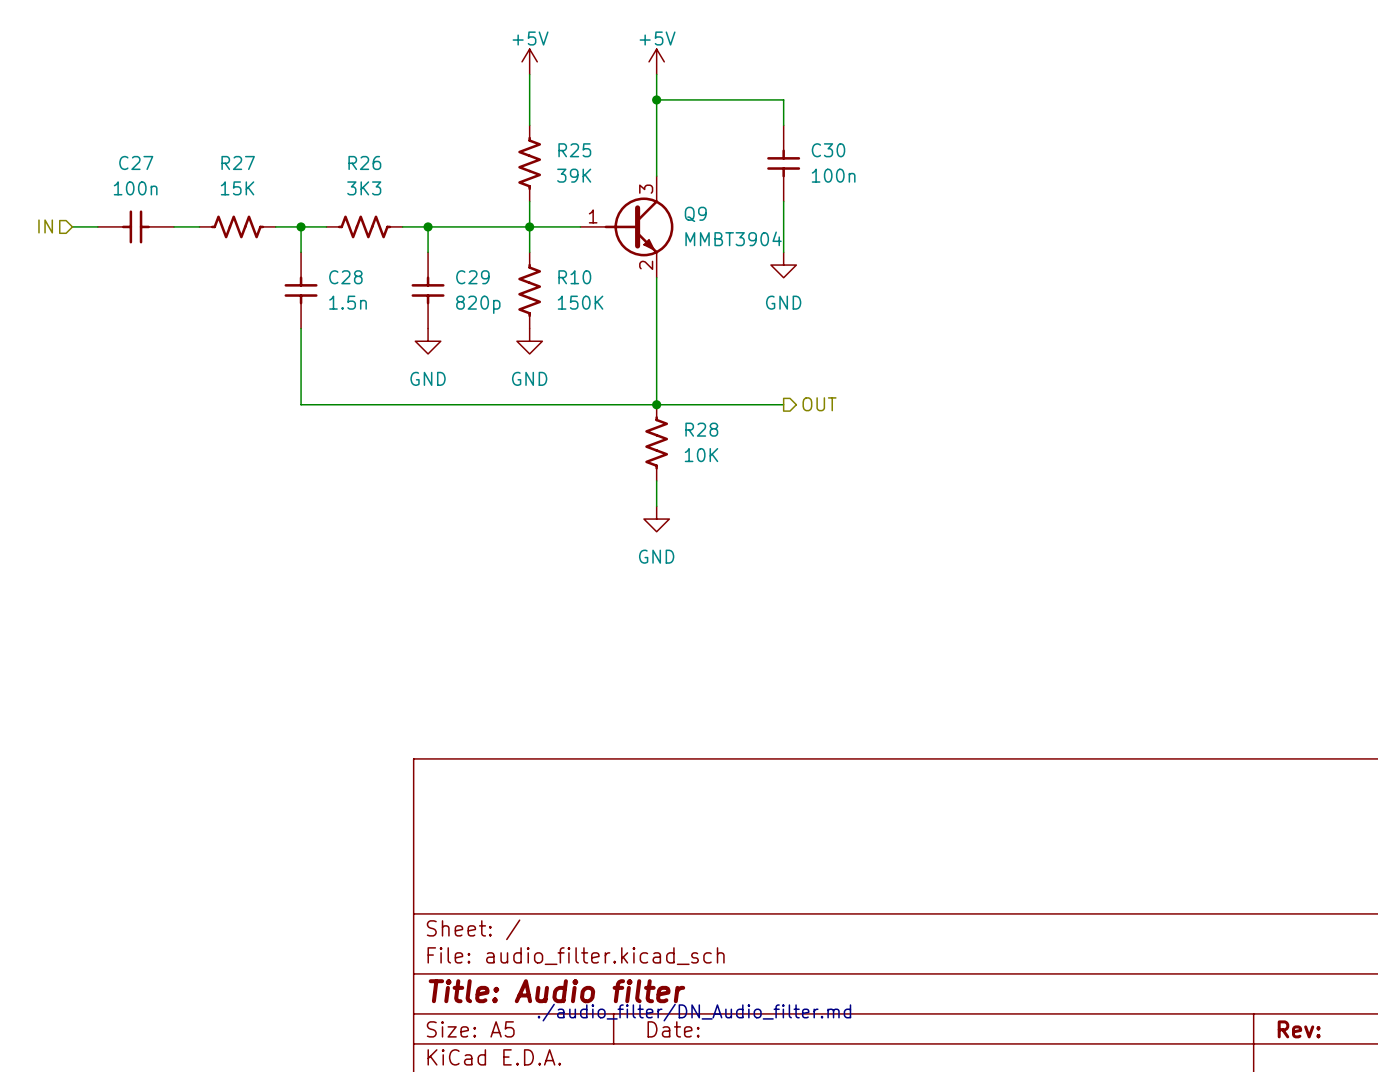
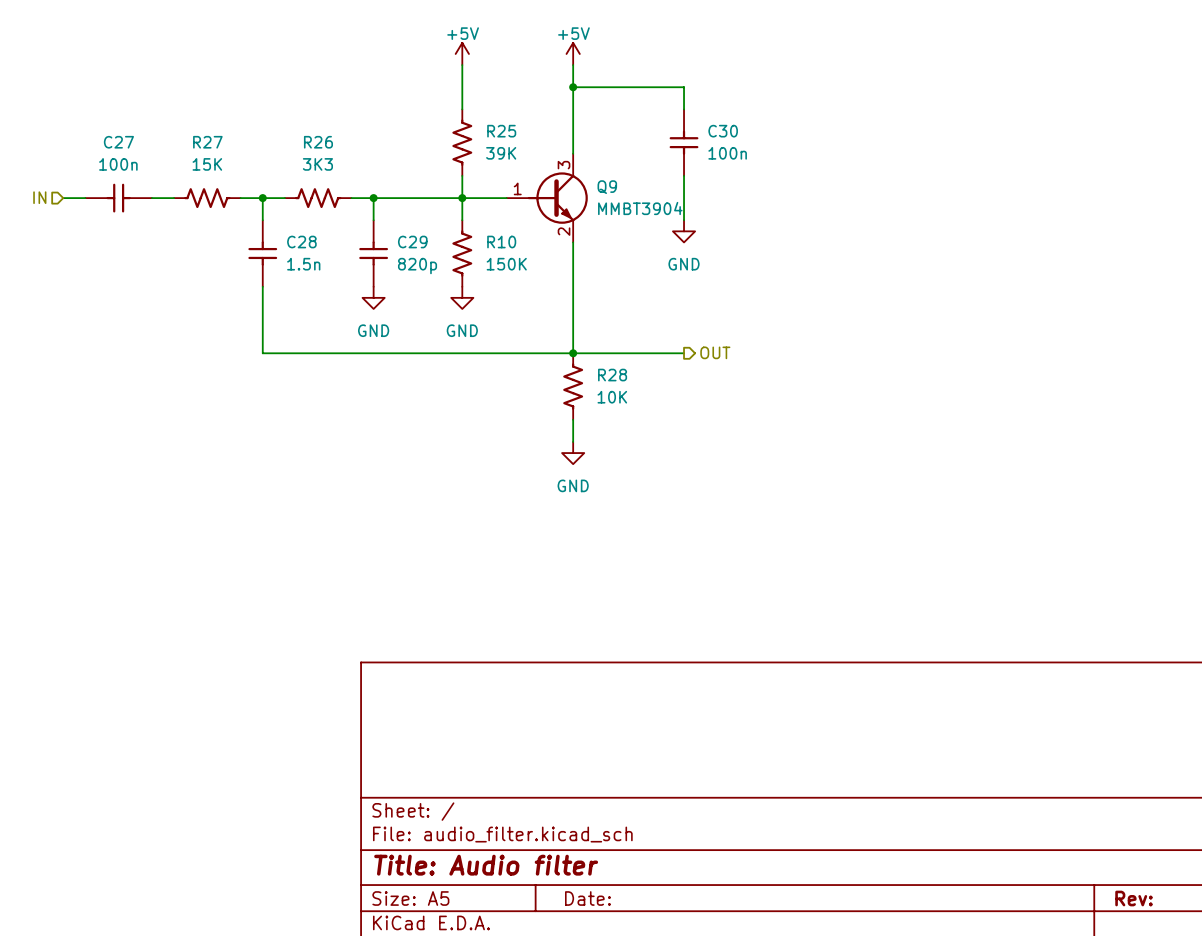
text: ./audio_filter/DN_Audio_filter.md (694, 1012) -> none

